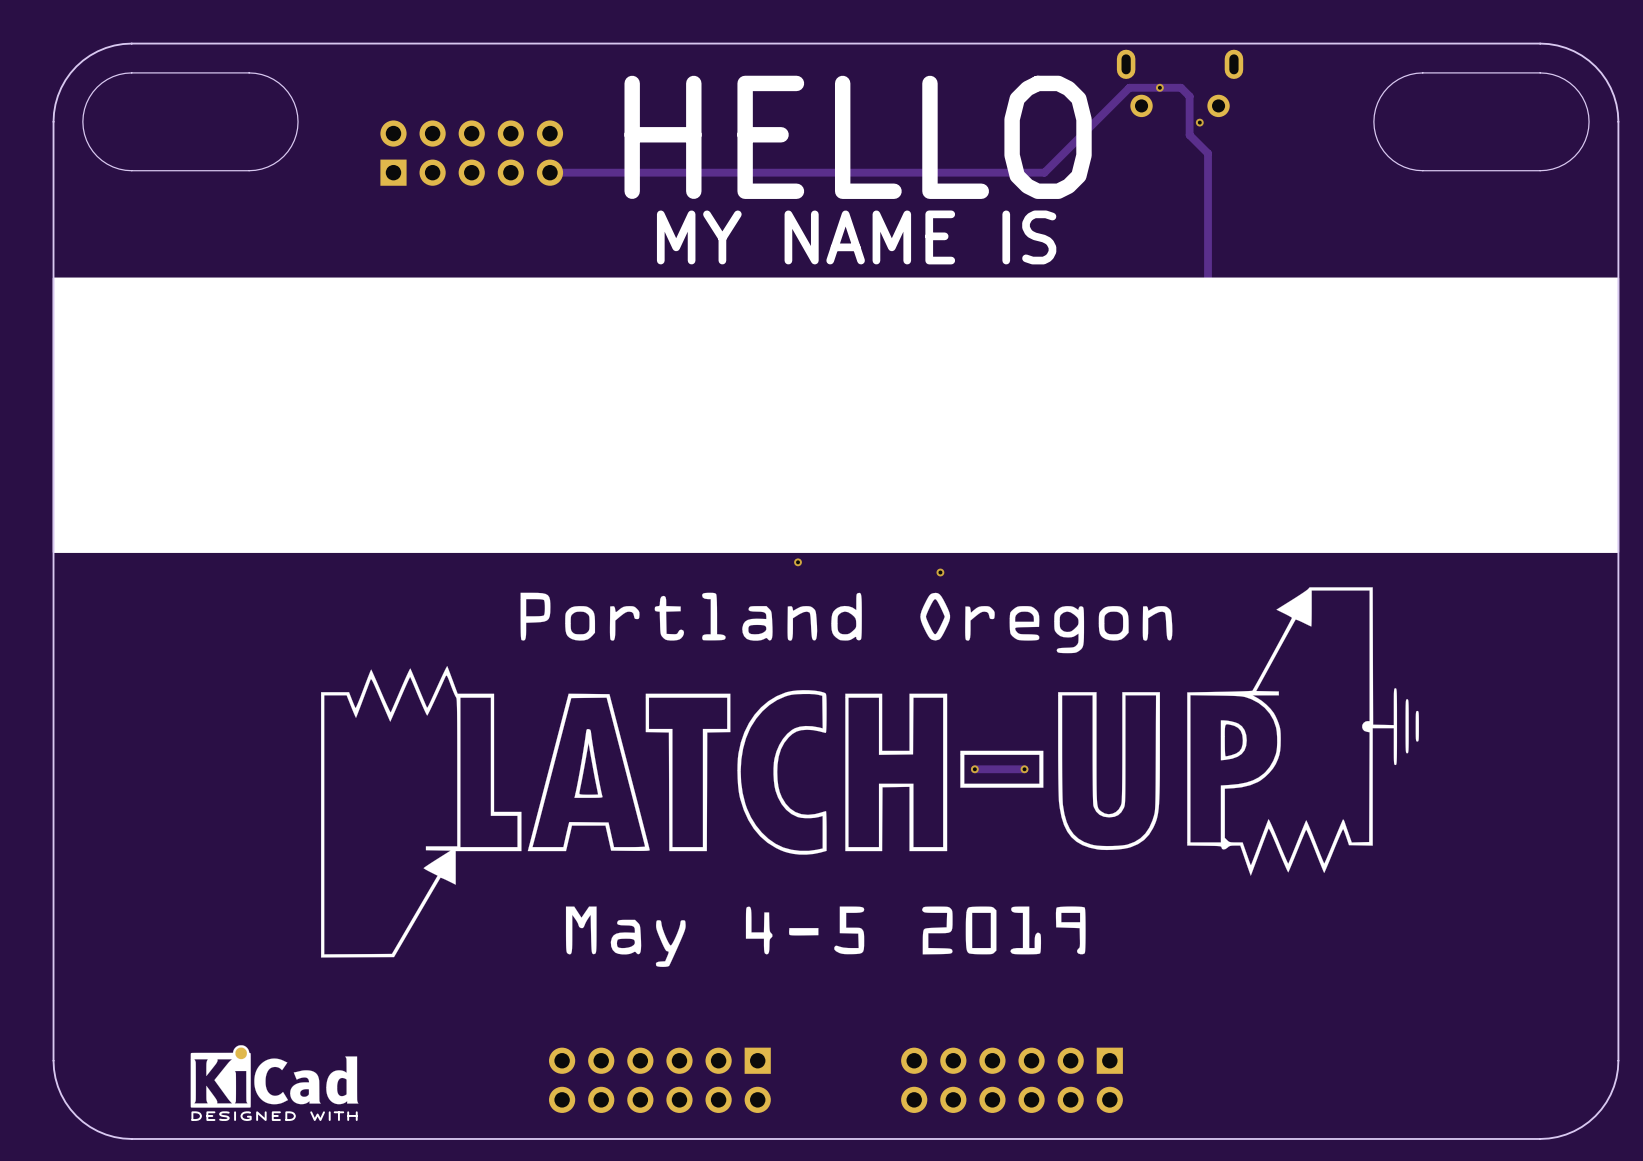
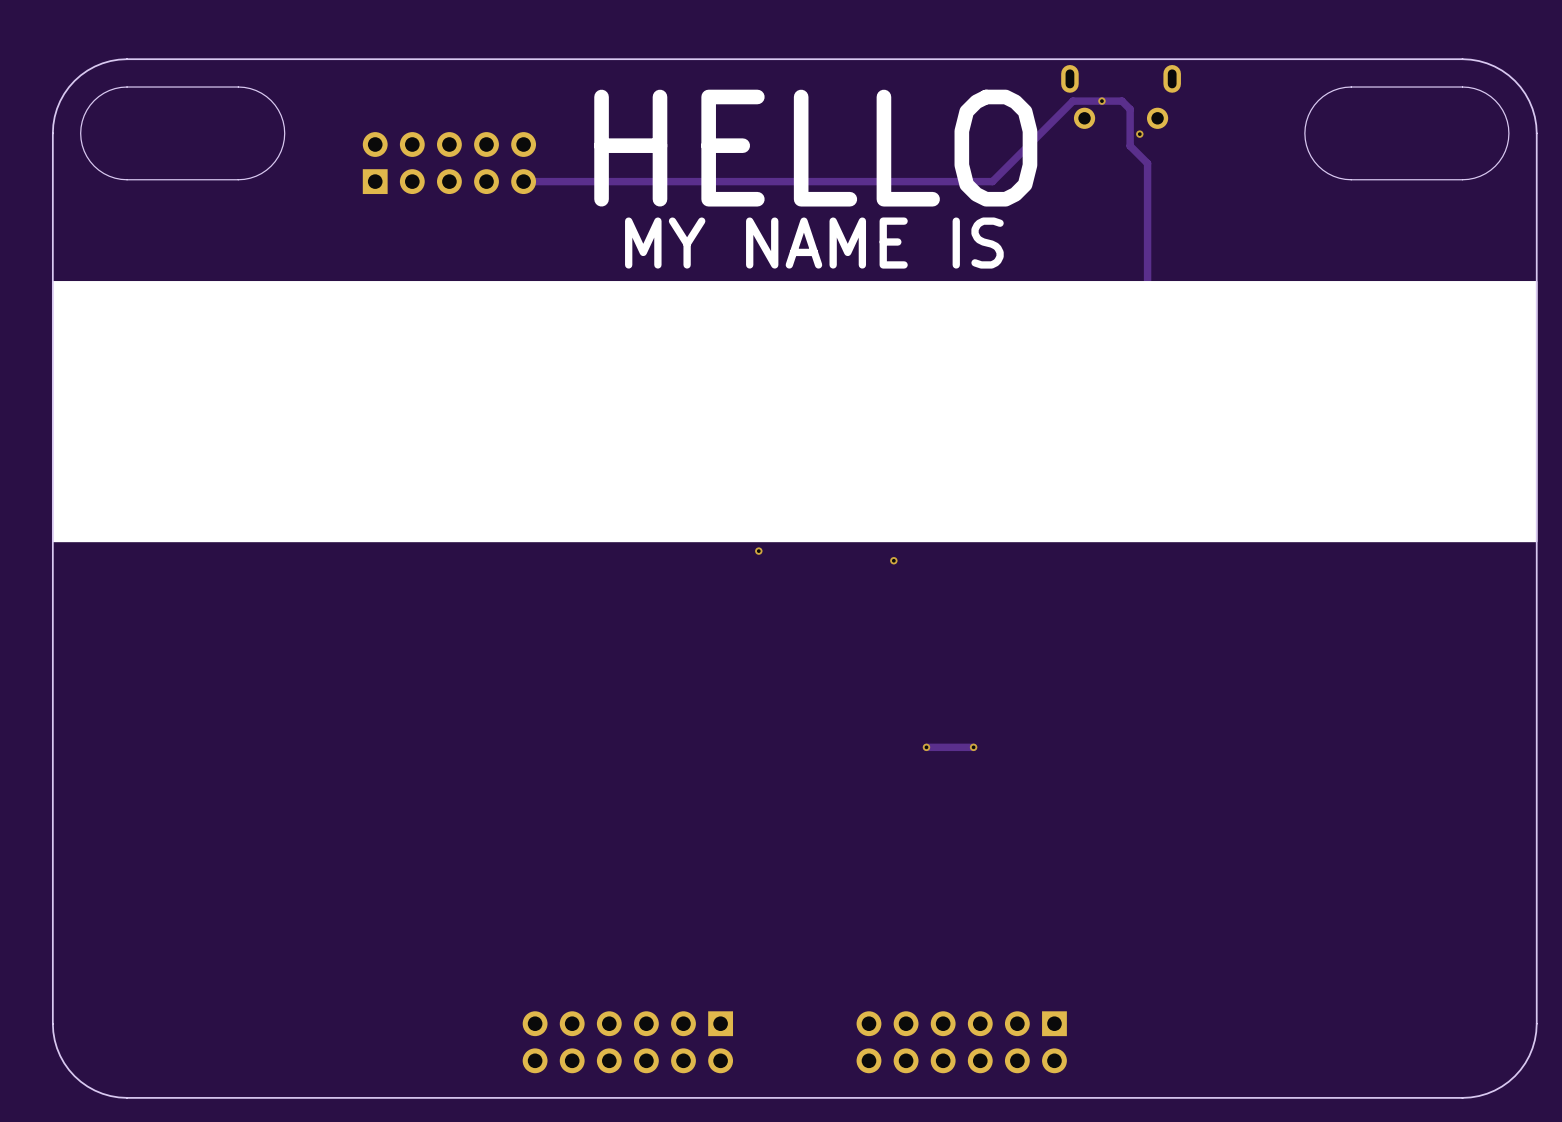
drawing: [321, 587, 1419, 967] -> none
part: (274, 1076) -> none

